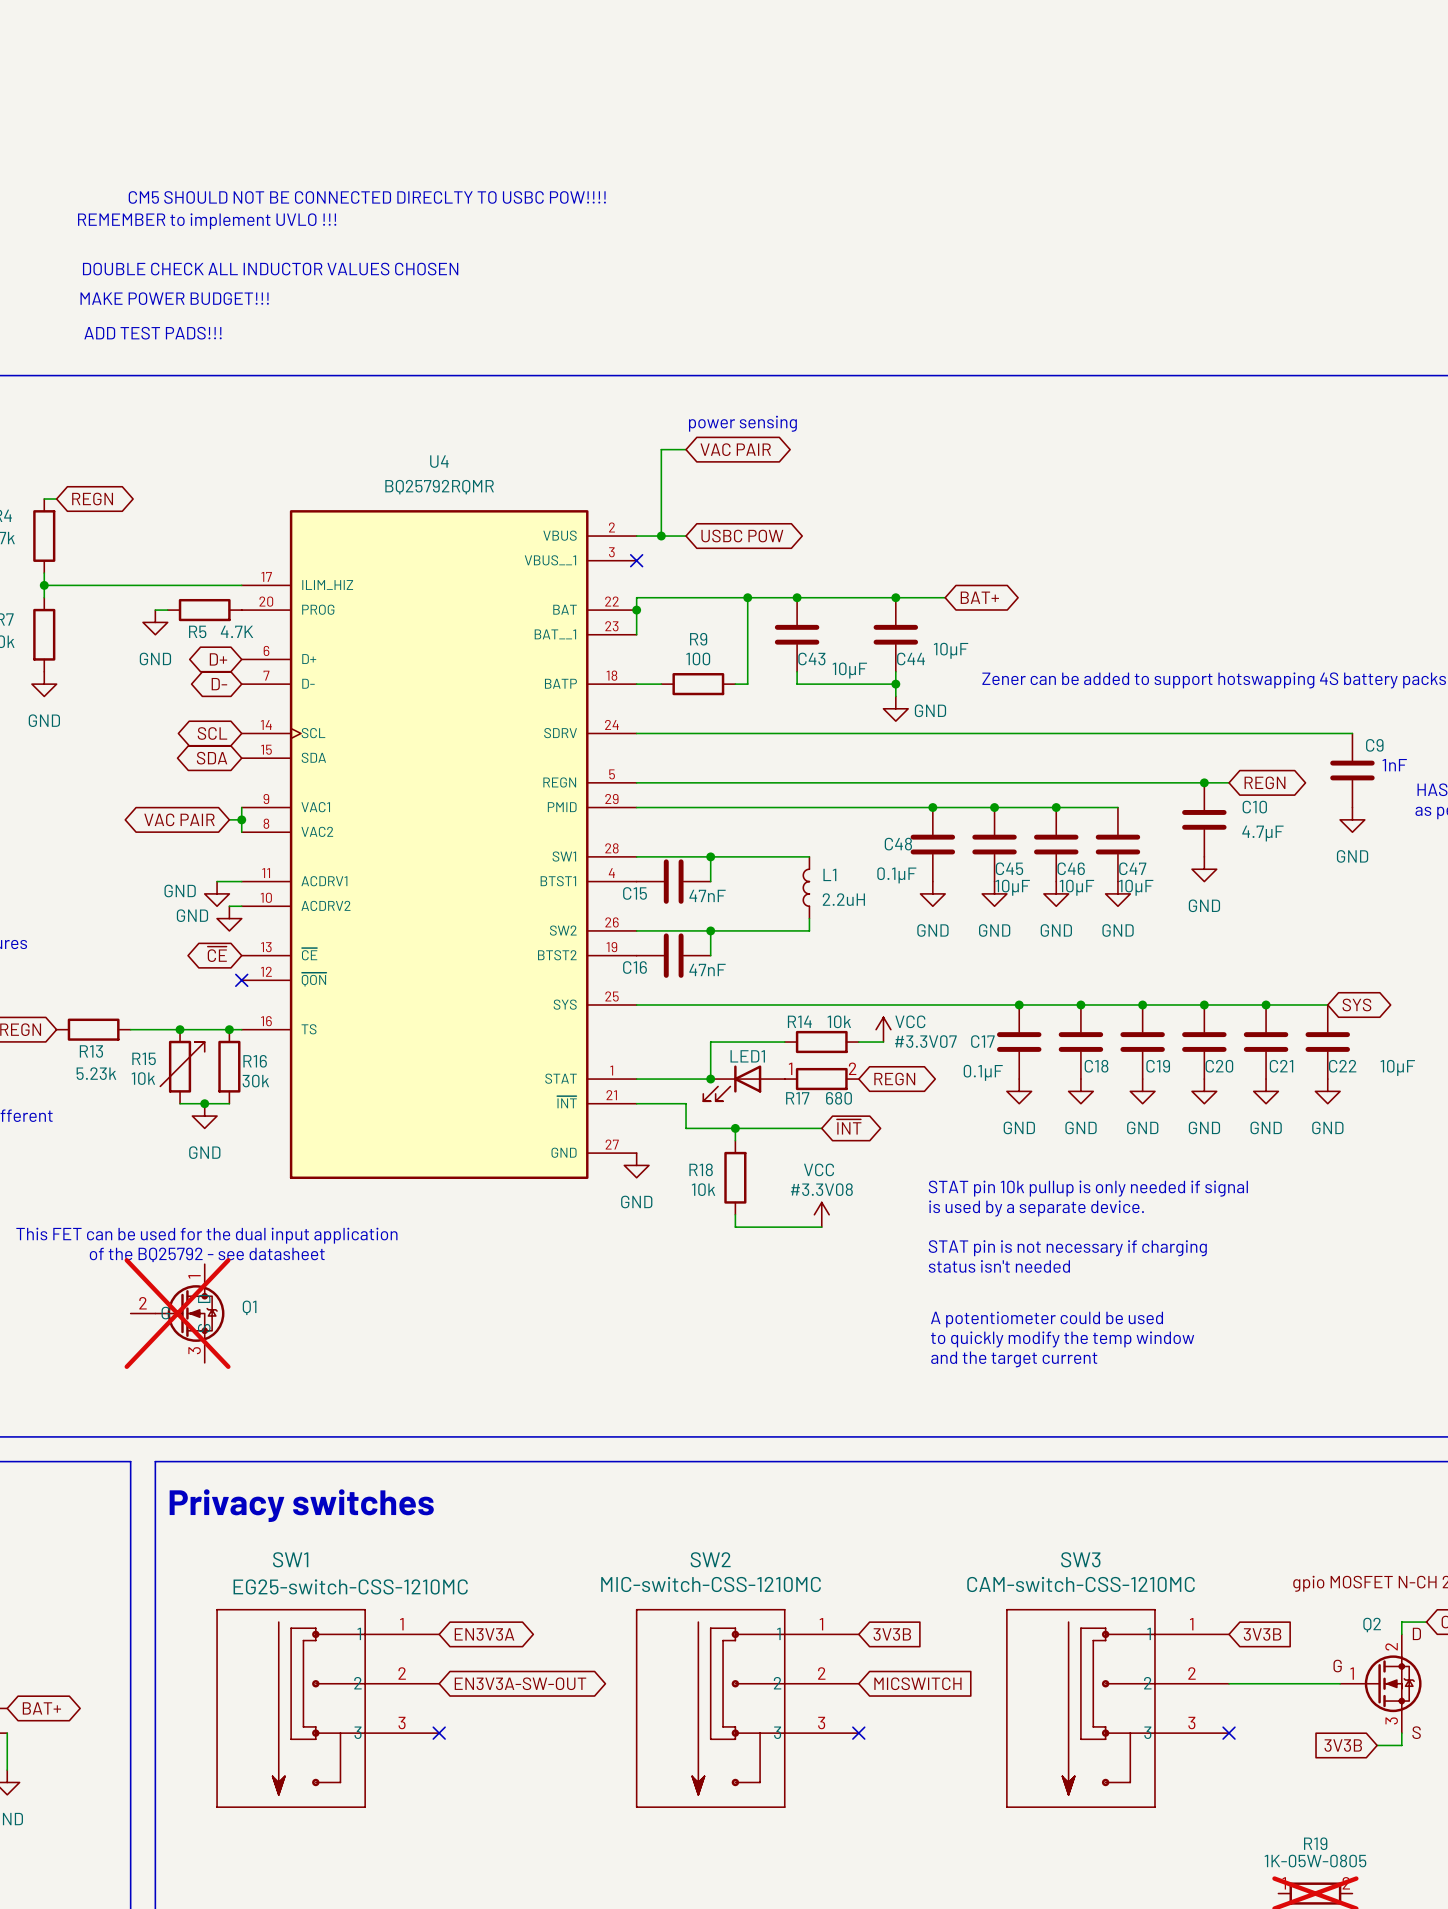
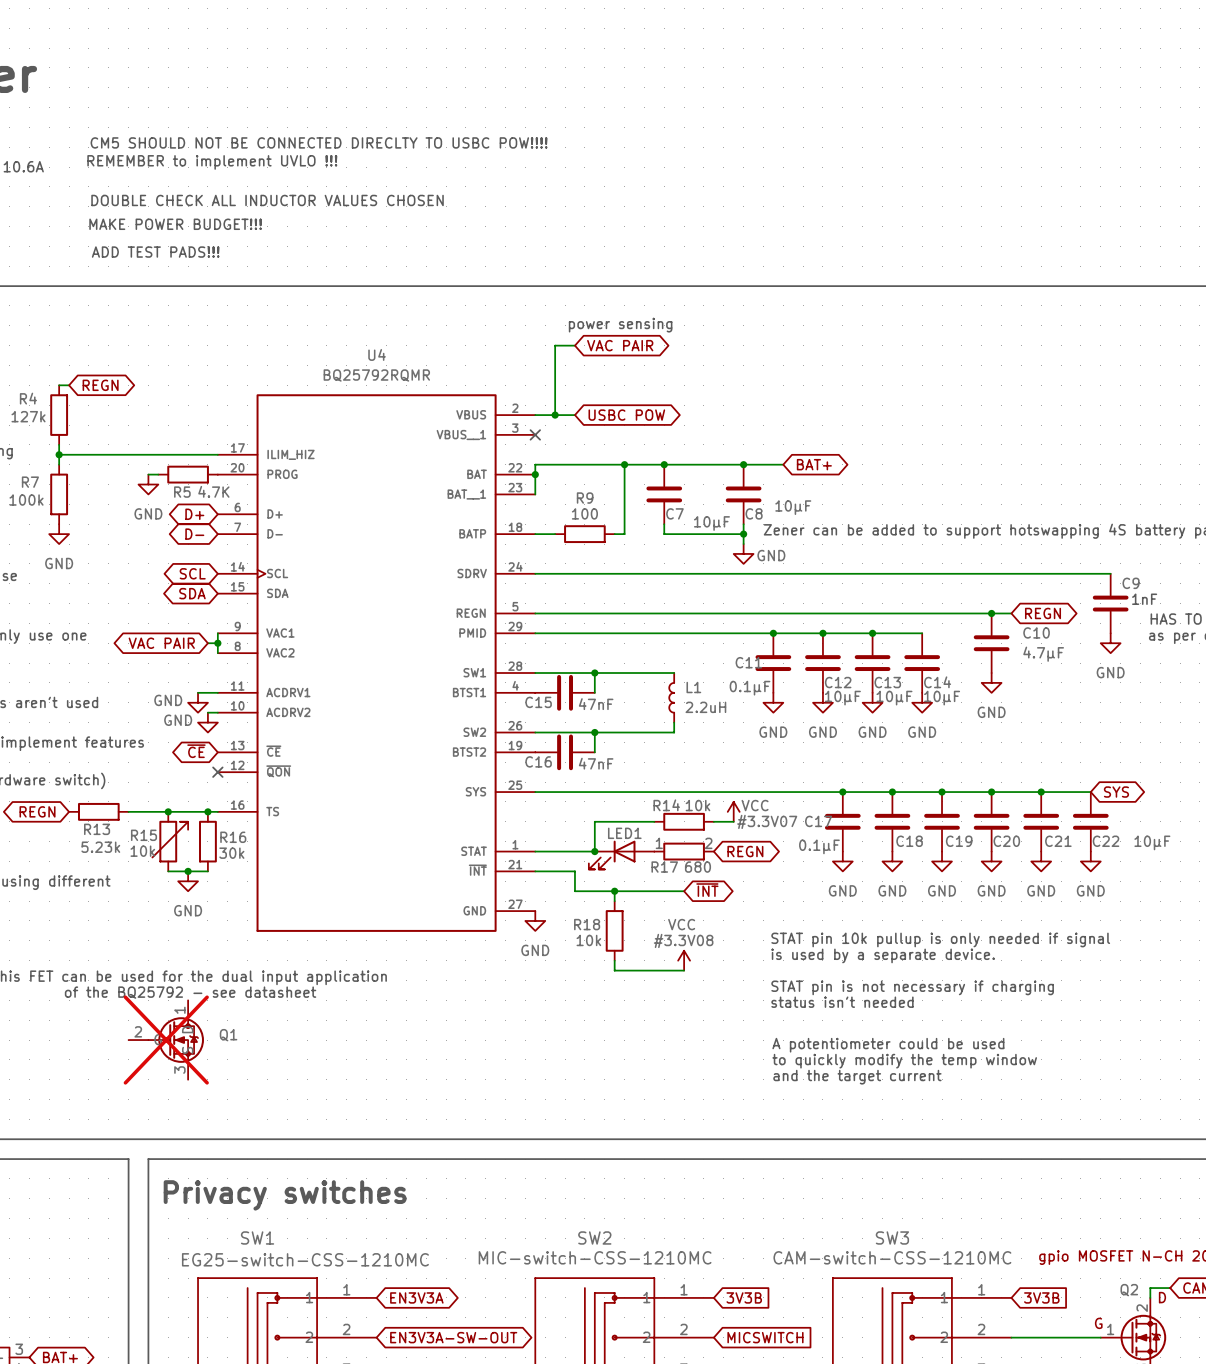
C43 name: C43 (811, 658) -> C7 (674, 513)
C44 name: C44 (910, 658) -> C8 (754, 513)
C48 name: C48 (898, 844) -> C11 (748, 662)
C45 name: C45 (1009, 868) -> C12 (838, 682)
C46 name: C46 (1071, 868) -> C13 (887, 682)
C47 name: C47 (1132, 868) -> C14 (937, 682)

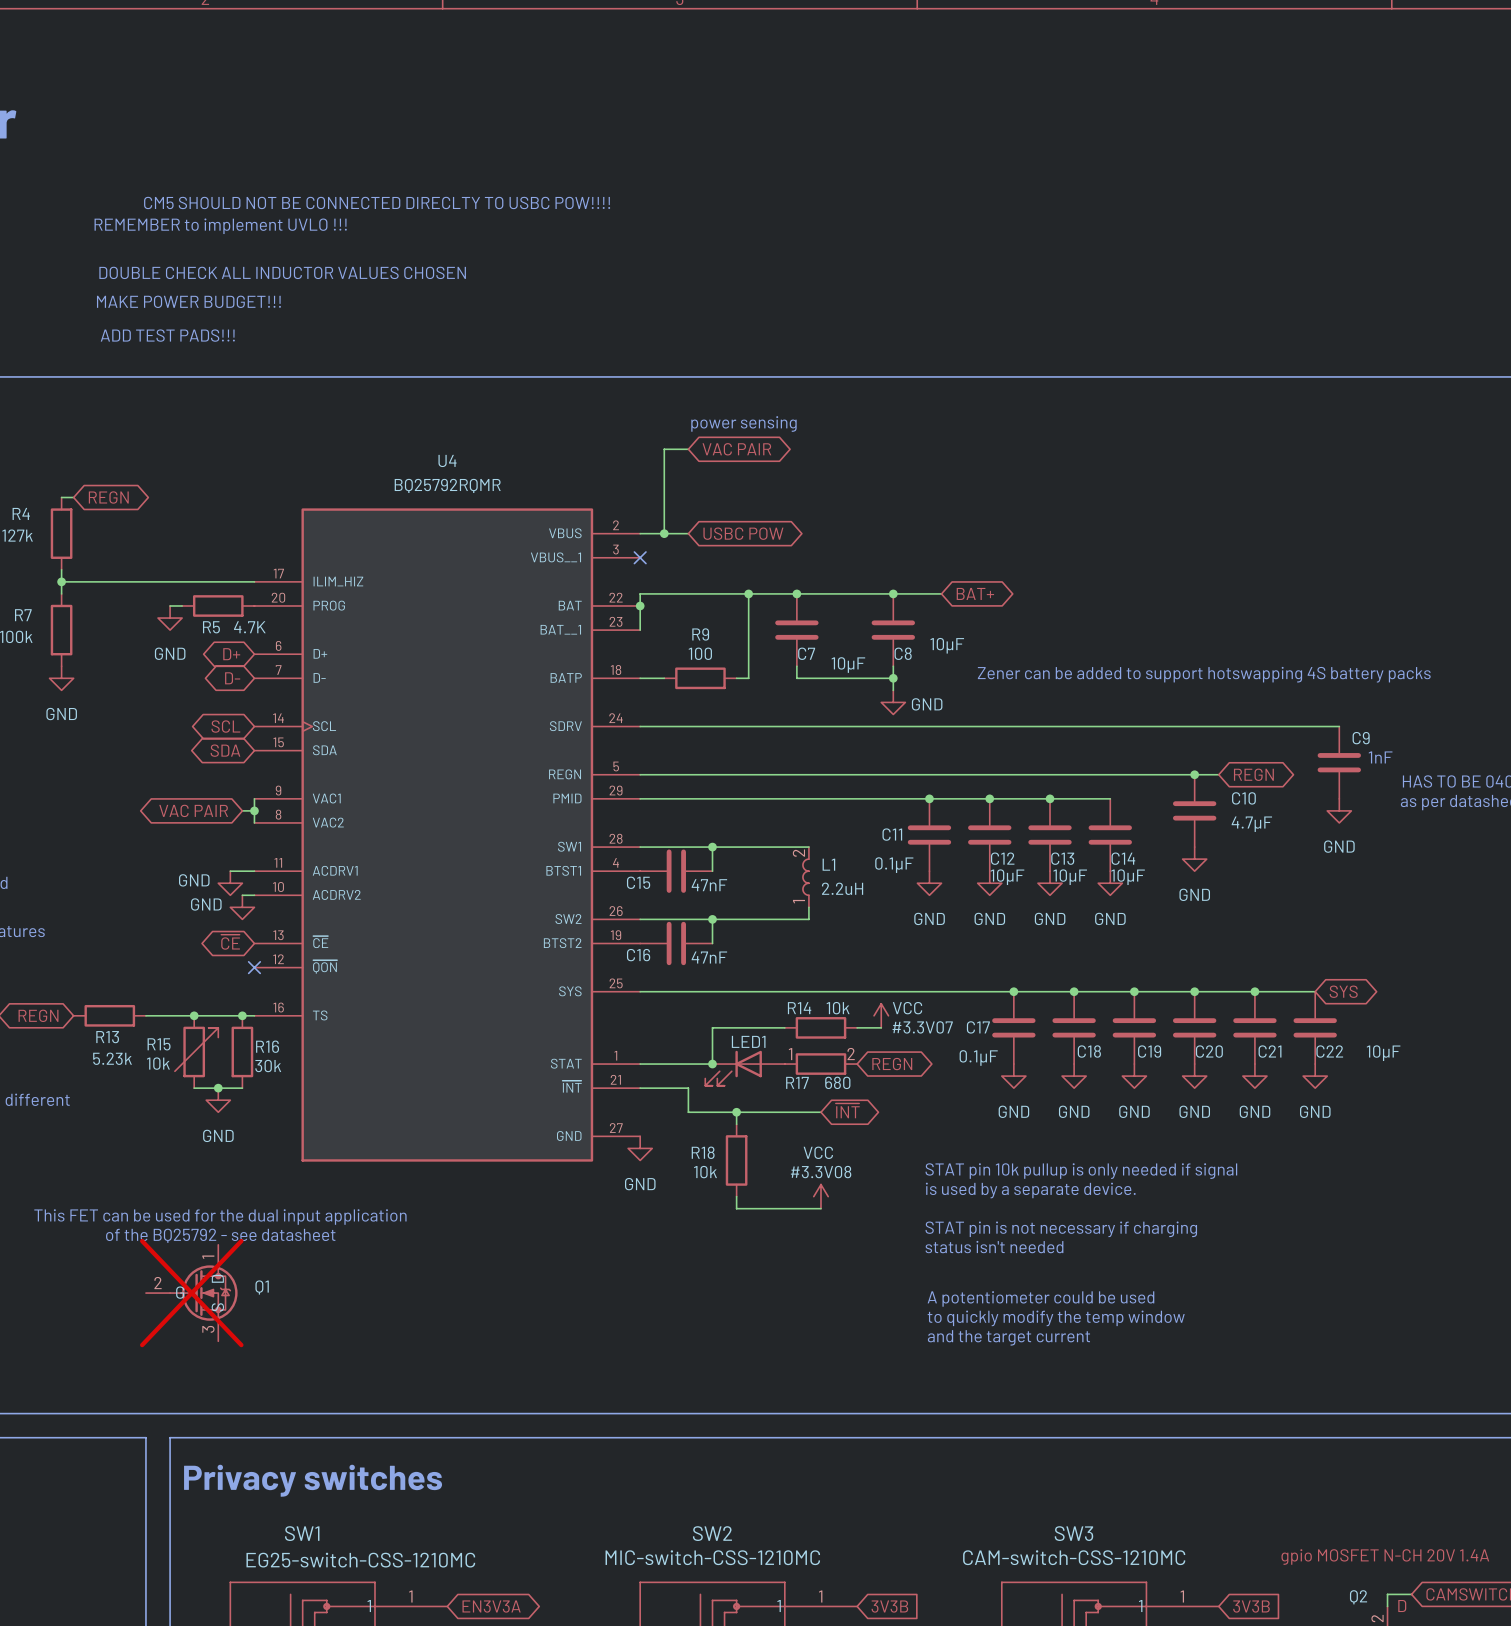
L1 pin number: none -> 2 (798, 853)
L1 pin number: none -> 1 (798, 901)

